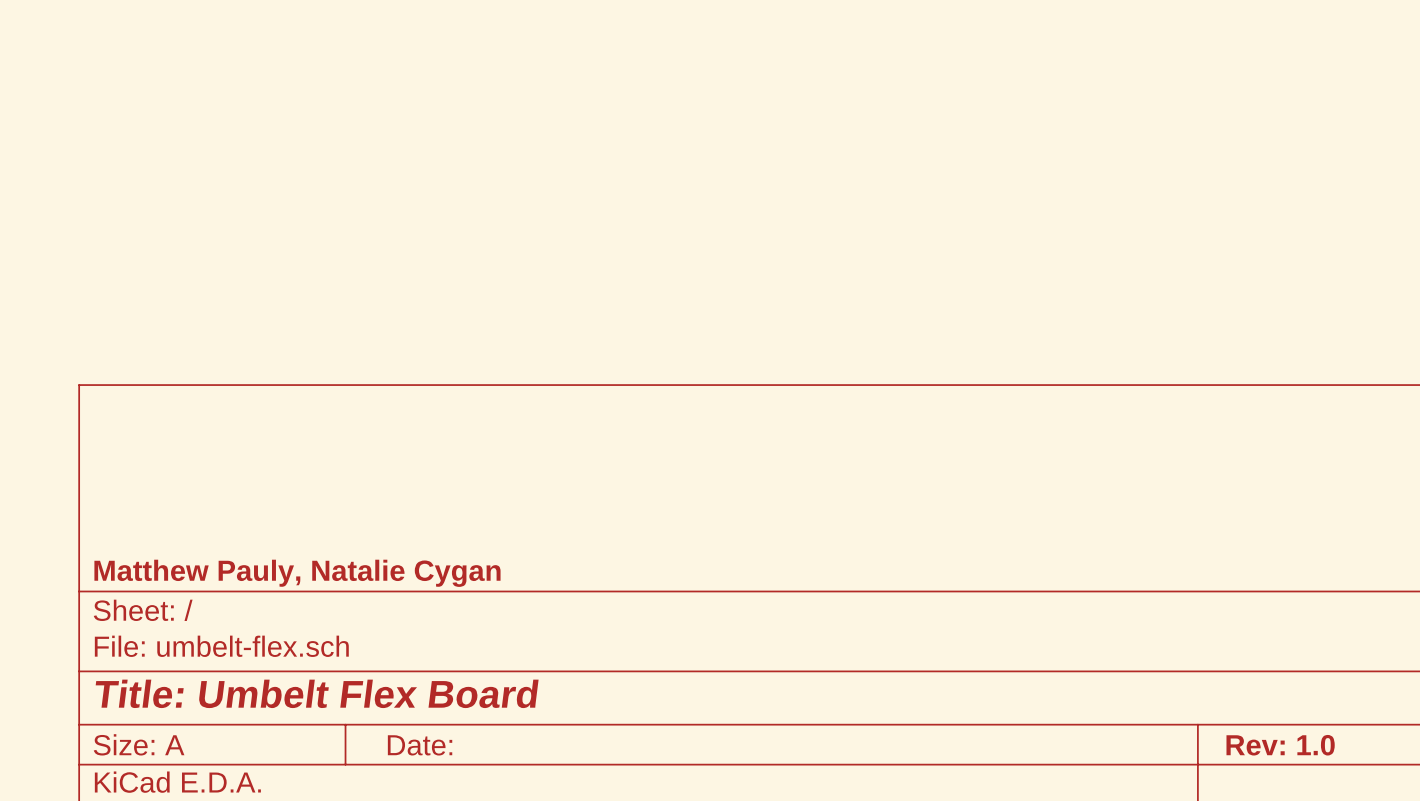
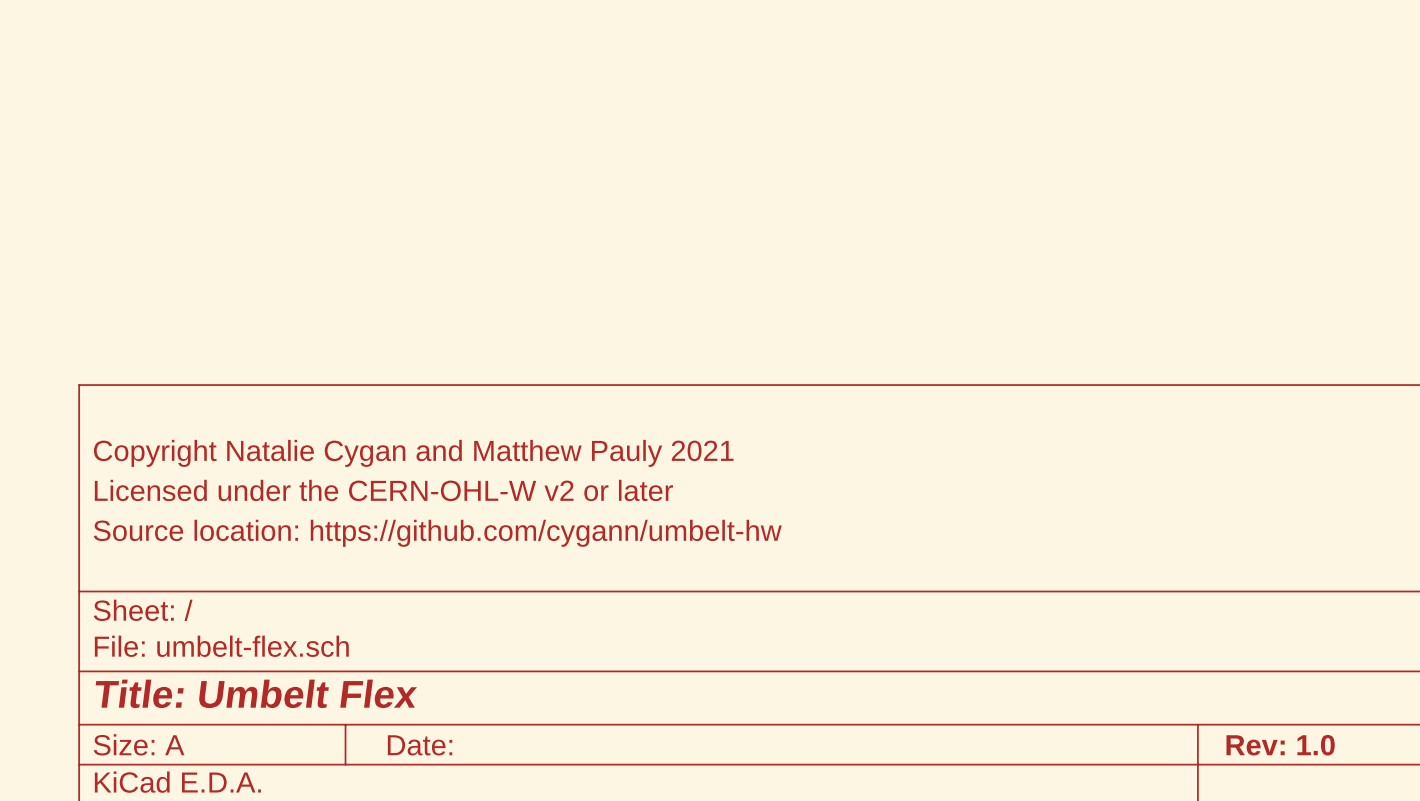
title block: none -> Copyright Natalie Cygan and Matthew Pauly 2021 (413, 453)
title block: none -> Licensed under the CERN-OHL-W v2 or later (383, 490)
title block: none -> Source location: https://github.com/cygann/umbelt-hw (437, 533)
title block: Matthew Pauly, Natalie Cygan (297, 573) -> none
title block: Title: Umbelt Flex Board (317, 693) -> Title: Umbelt Flex (256, 693)

